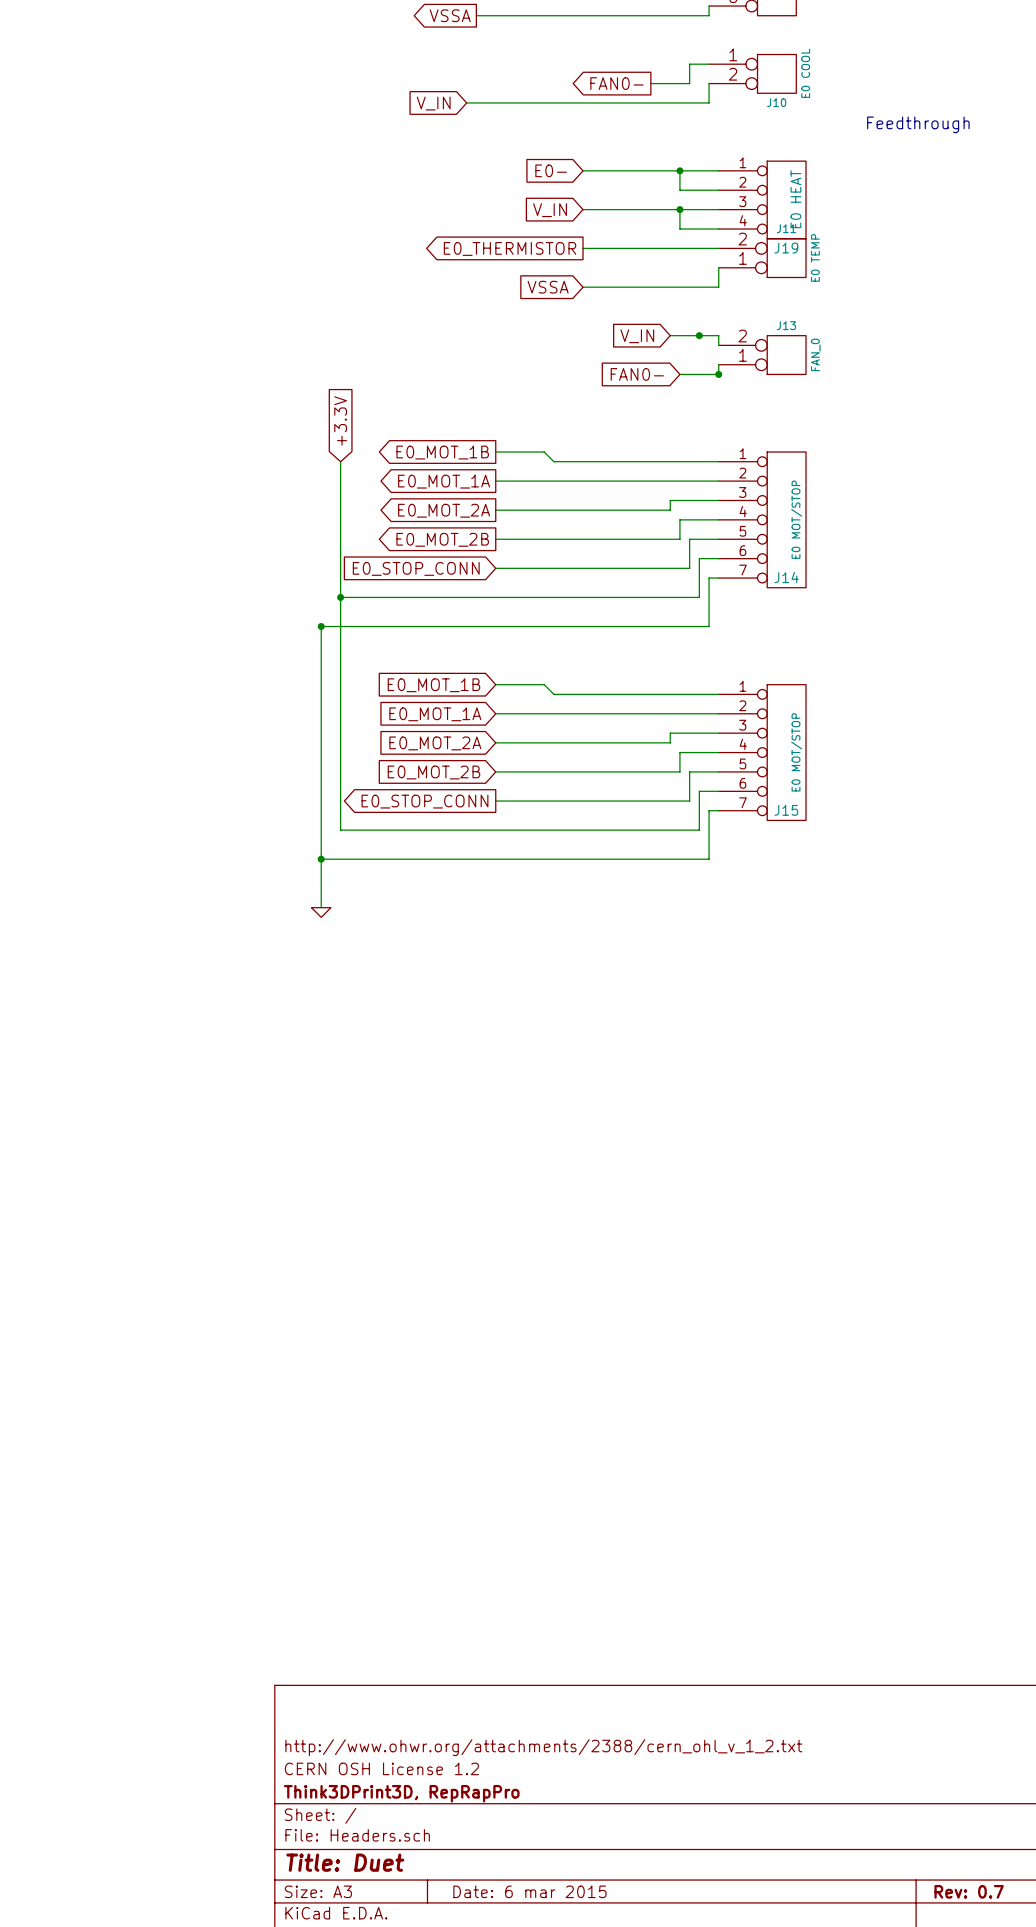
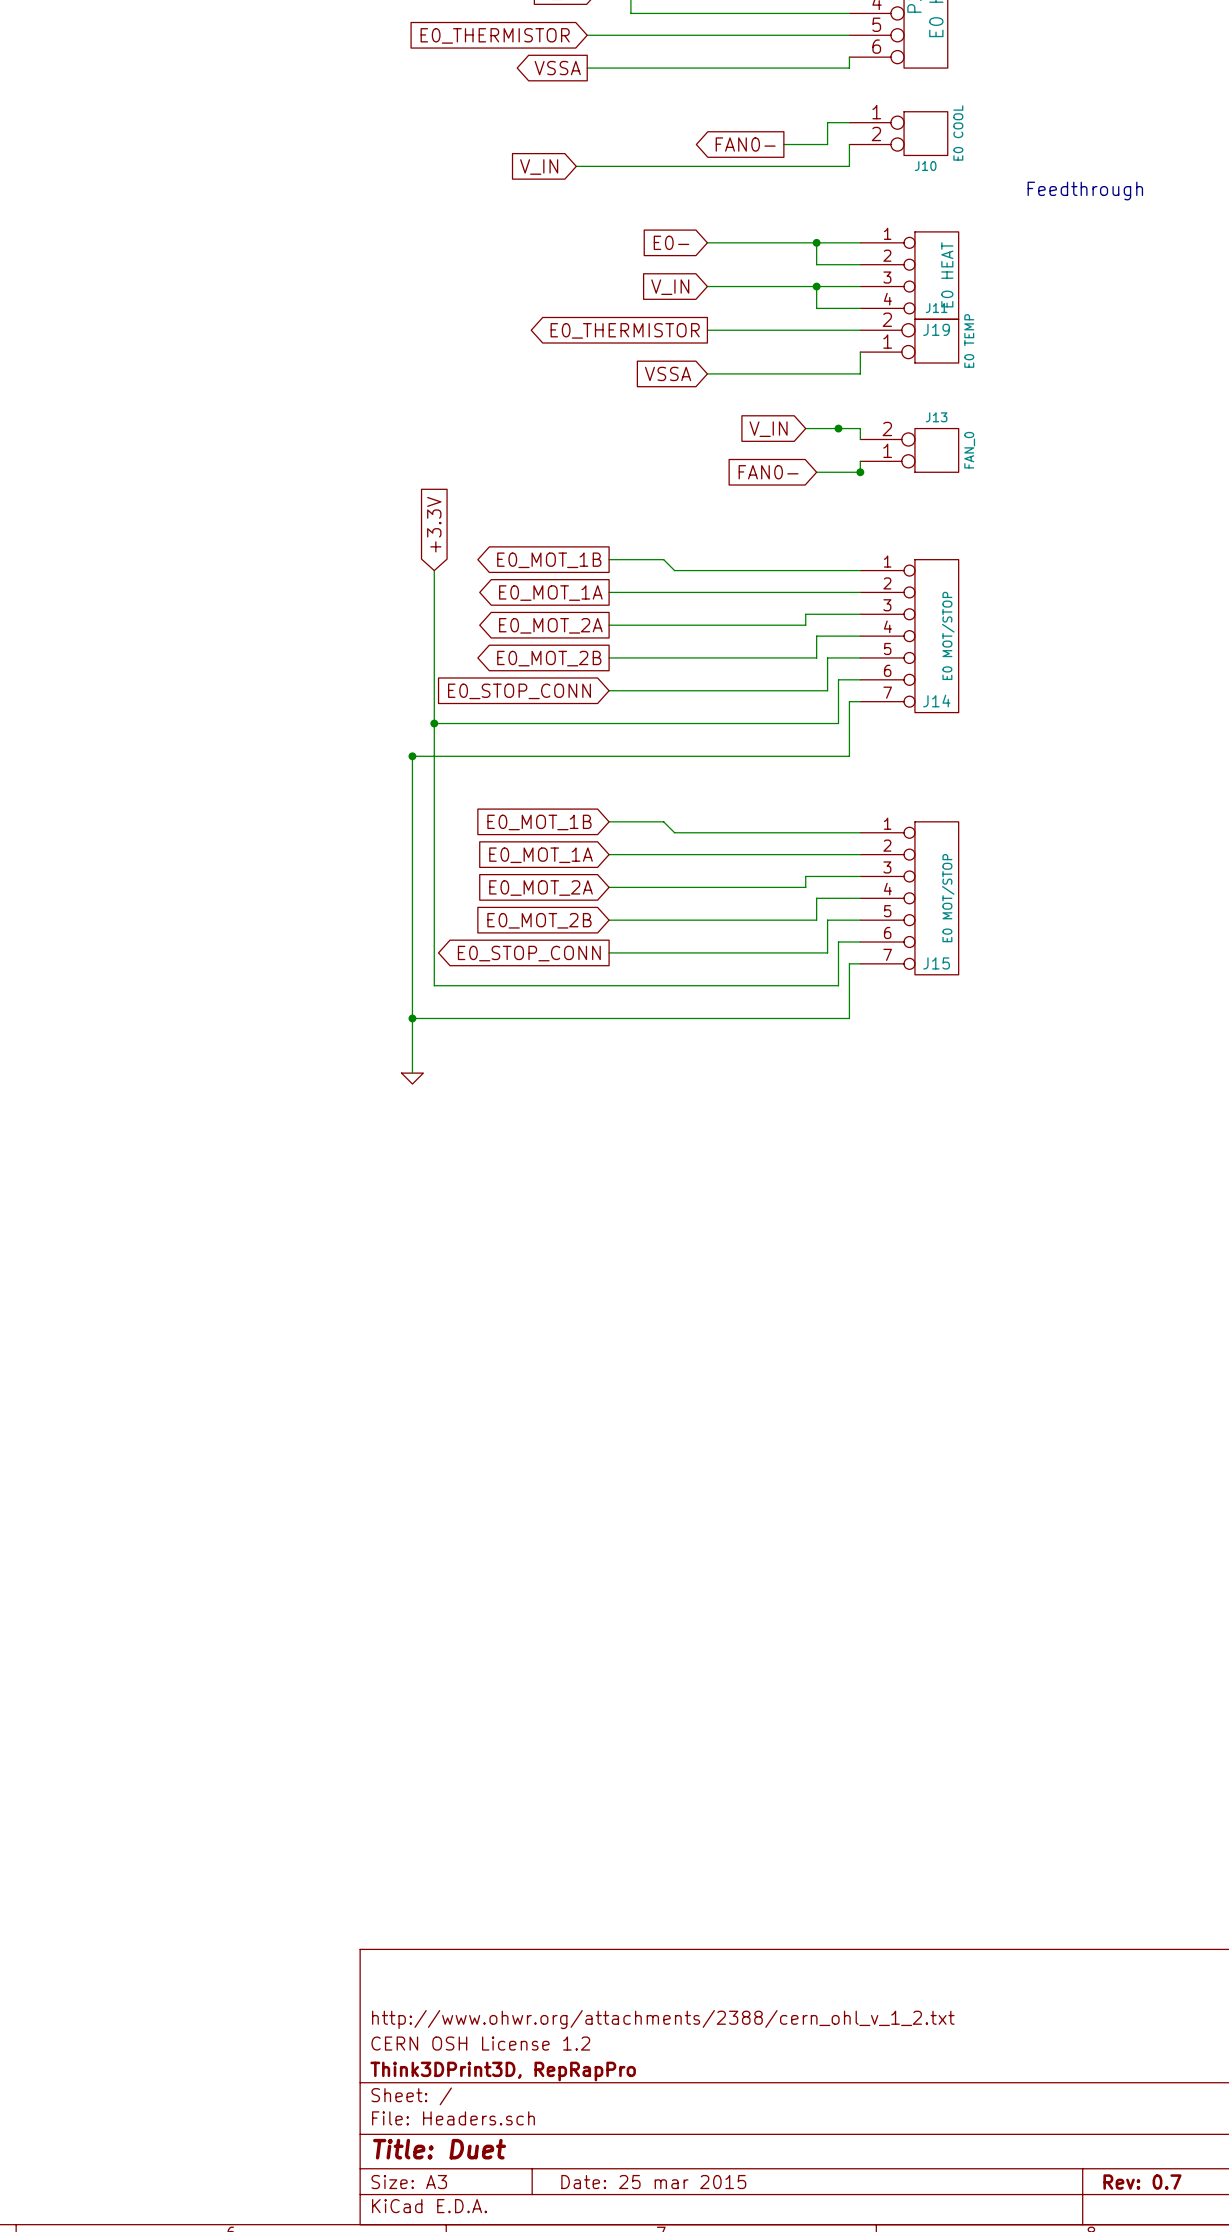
title block: Date: 6 mar 2015 (529, 1891) -> Date: 25 mar 2015 (653, 2182)

